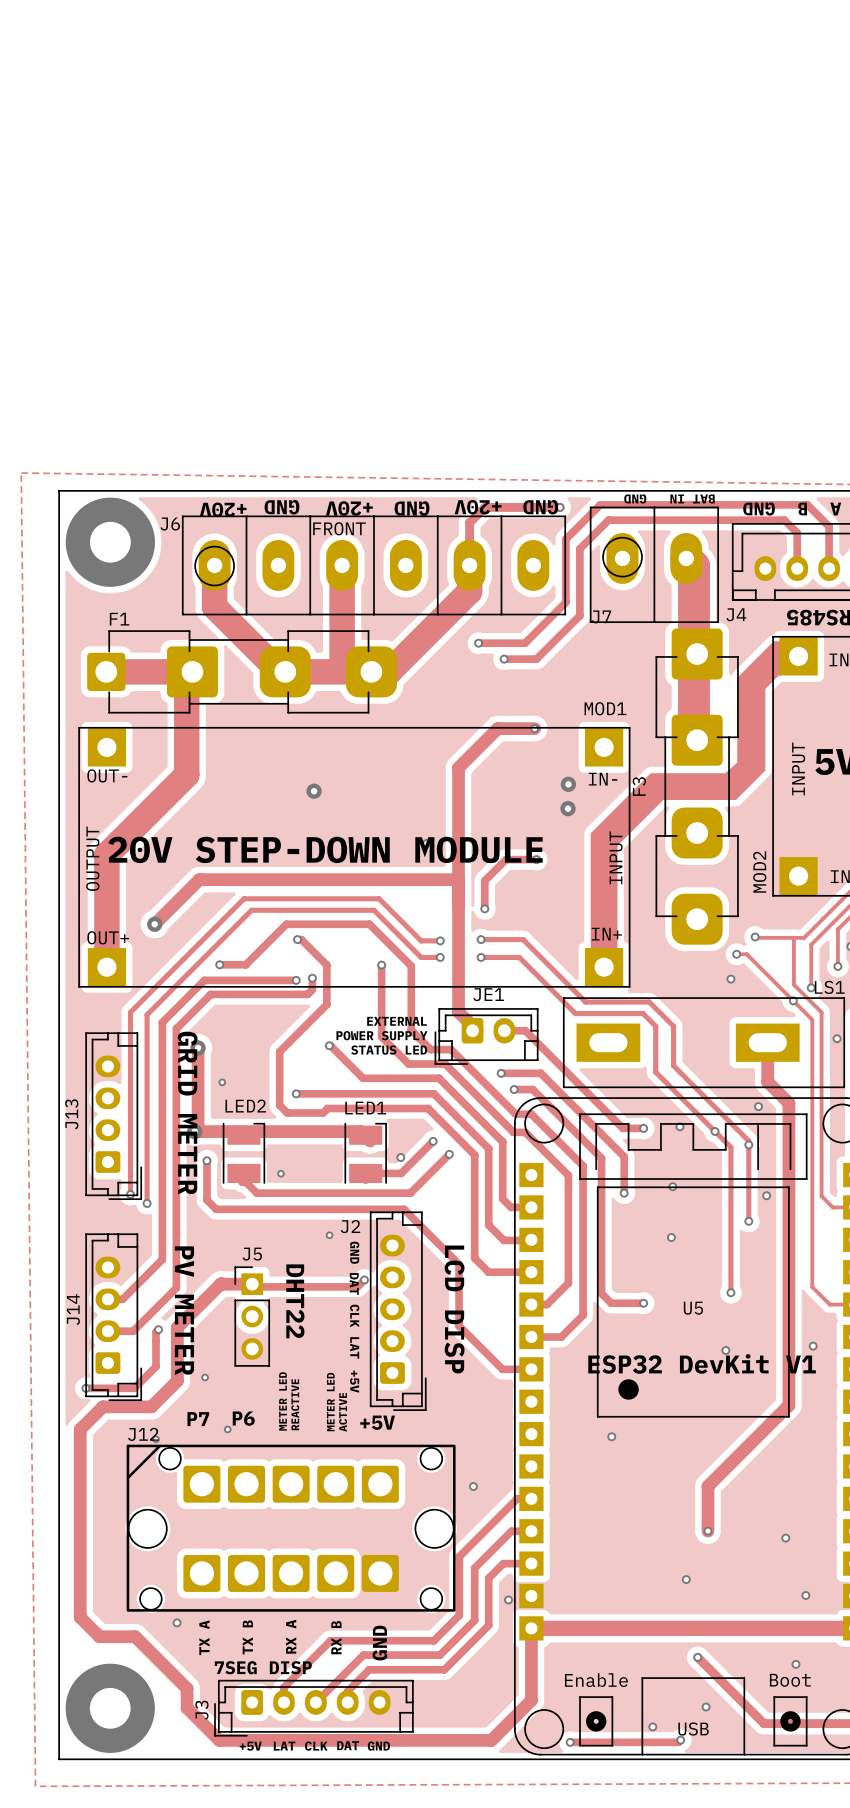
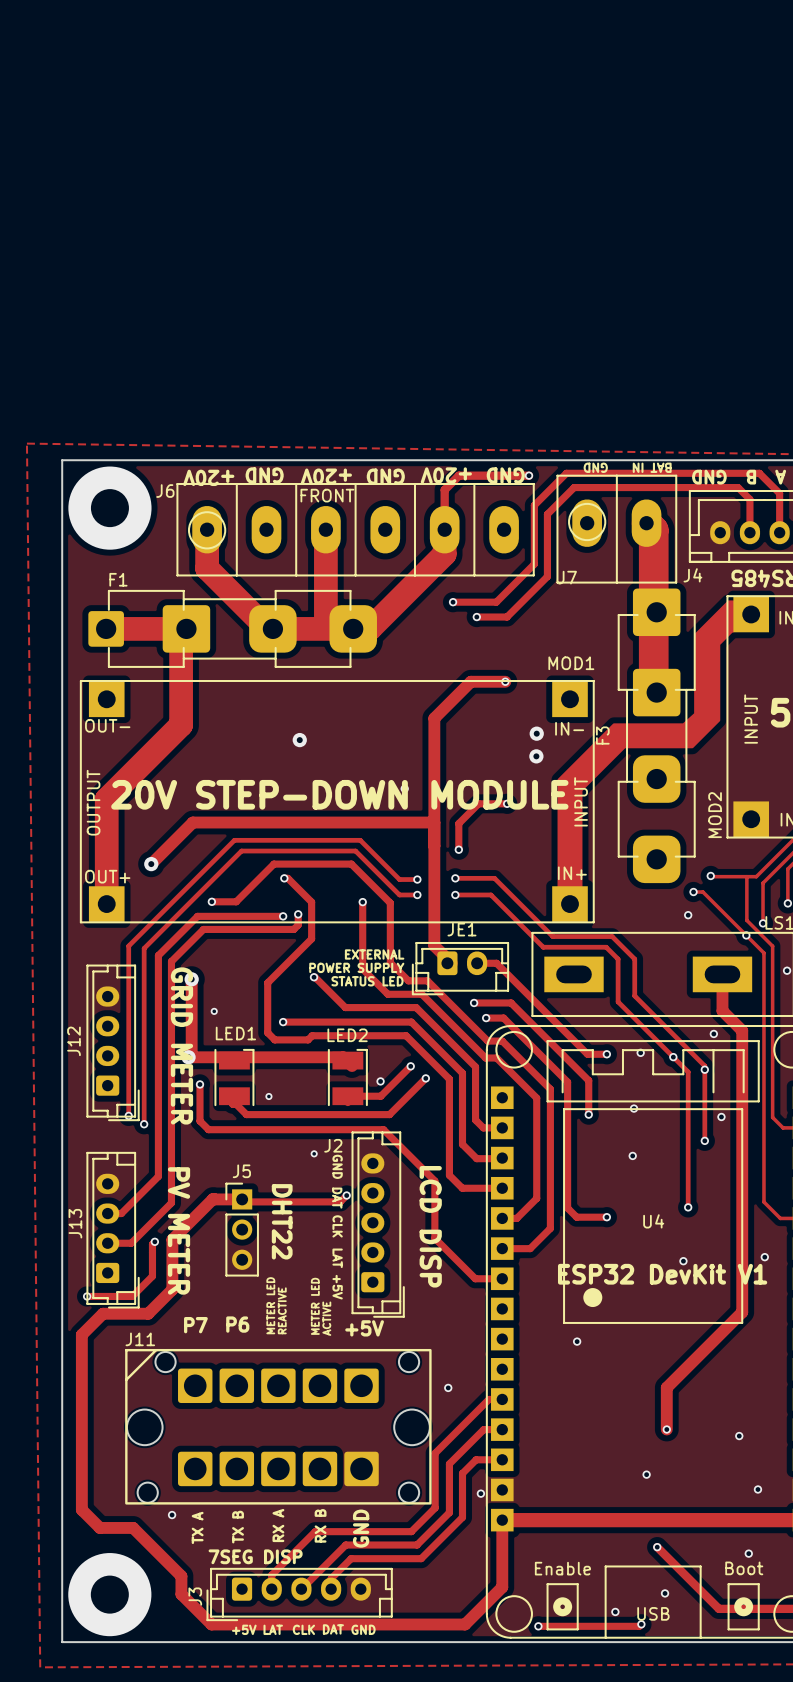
LED2 name: LED2 (245, 1106) -> LED1 (235, 1033)
LED1 name: LED1 (365, 1108) -> LED2 (347, 1035)
J13 name: J13 (71, 1114) -> J12 (73, 1041)
U5 name: U5 (693, 1308) -> U4 (653, 1221)
J14 name: J14 (73, 1309) -> J13 (75, 1223)
via: (205, 1377) -> none
via: (227, 1429) -> none
J12 name: J12 (143, 1434) -> J11 (140, 1339)
via: (156, 1439) -> none

